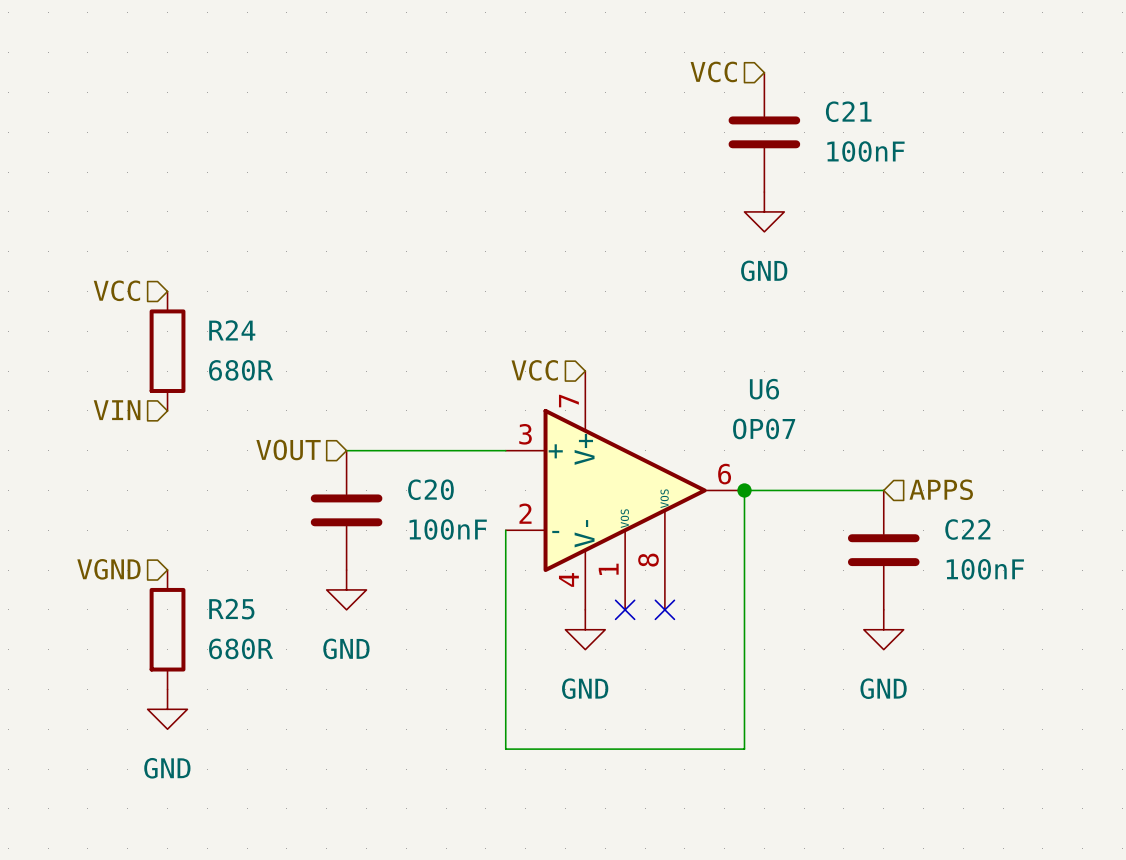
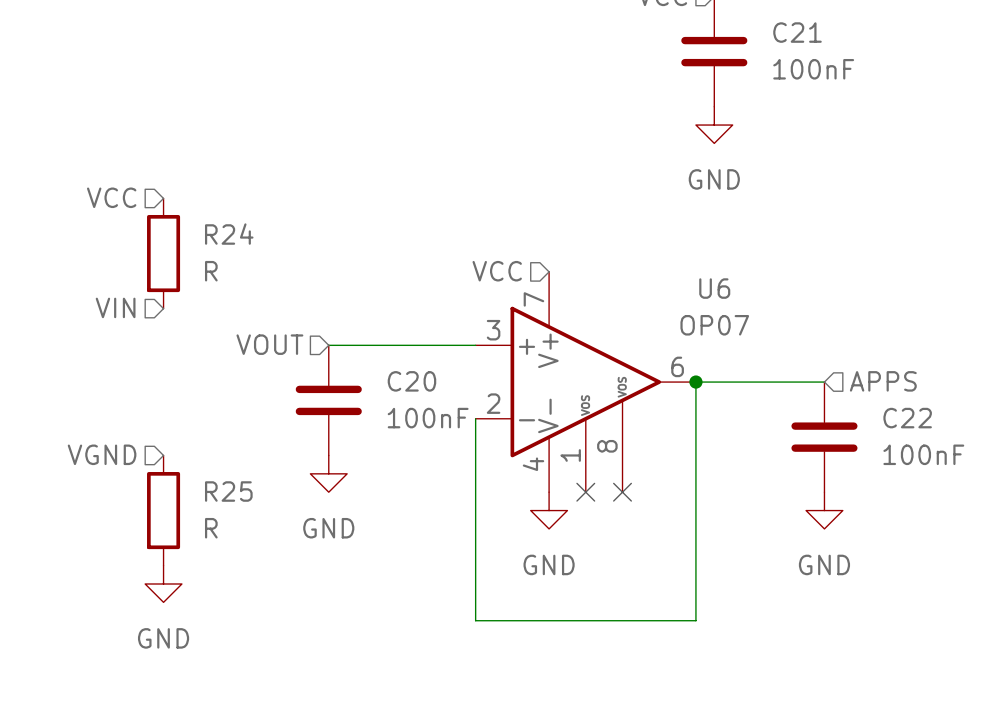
R24 value: 680R (241, 370) -> R (211, 271)
R25 value: 680R (241, 648) -> R (211, 528)

